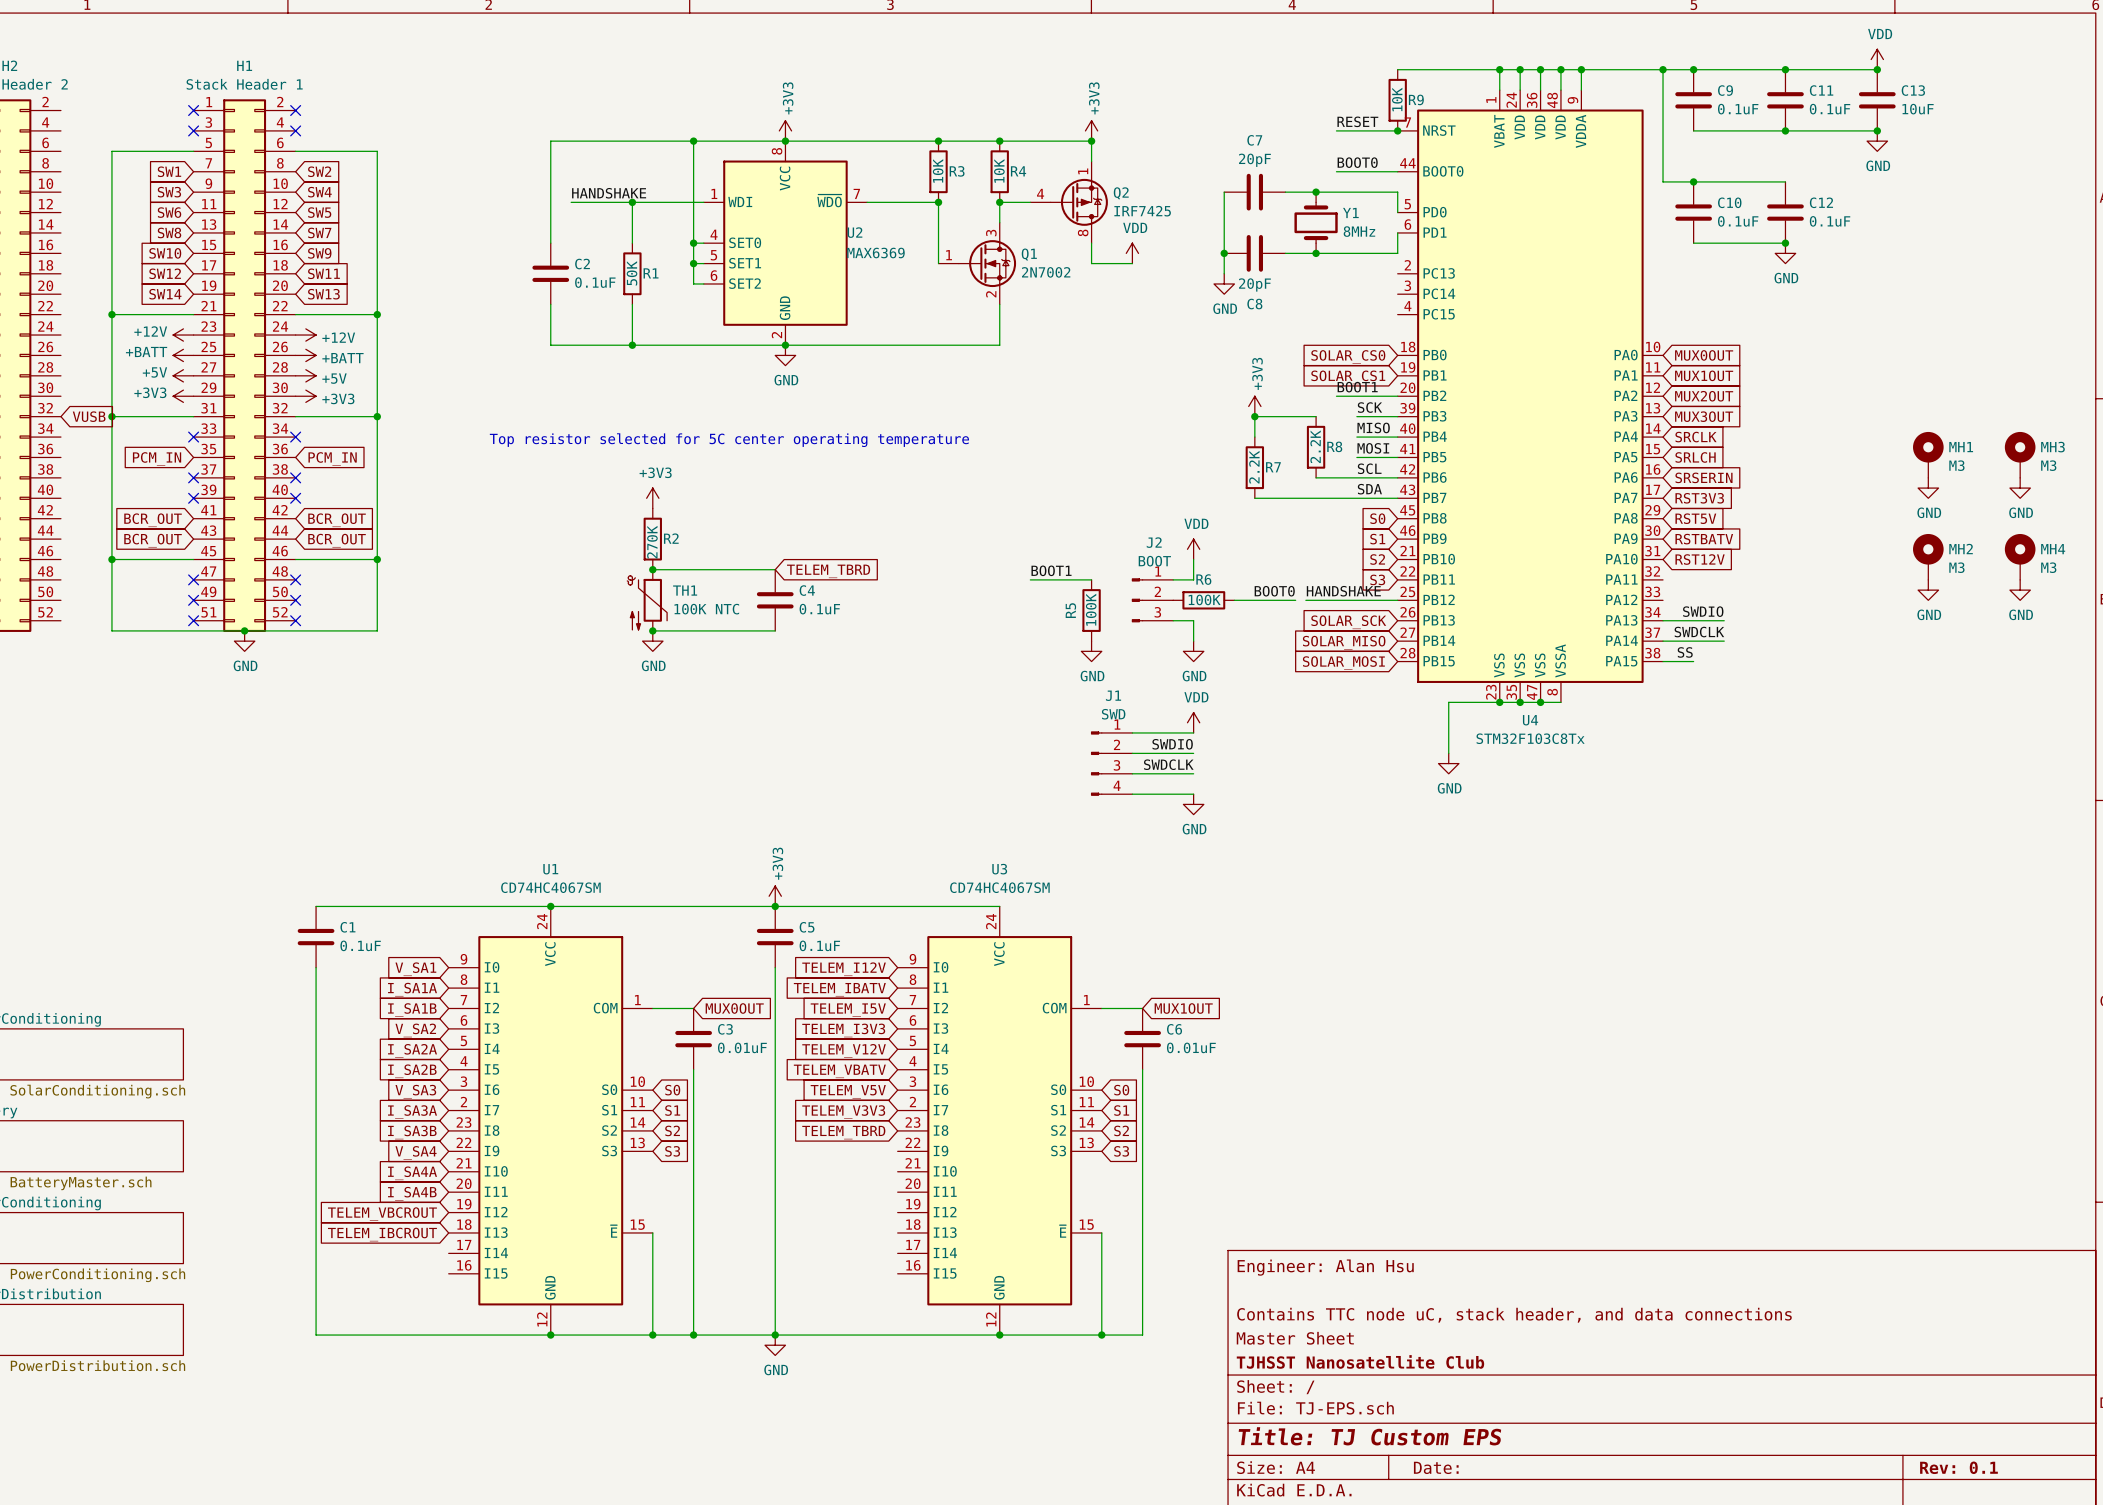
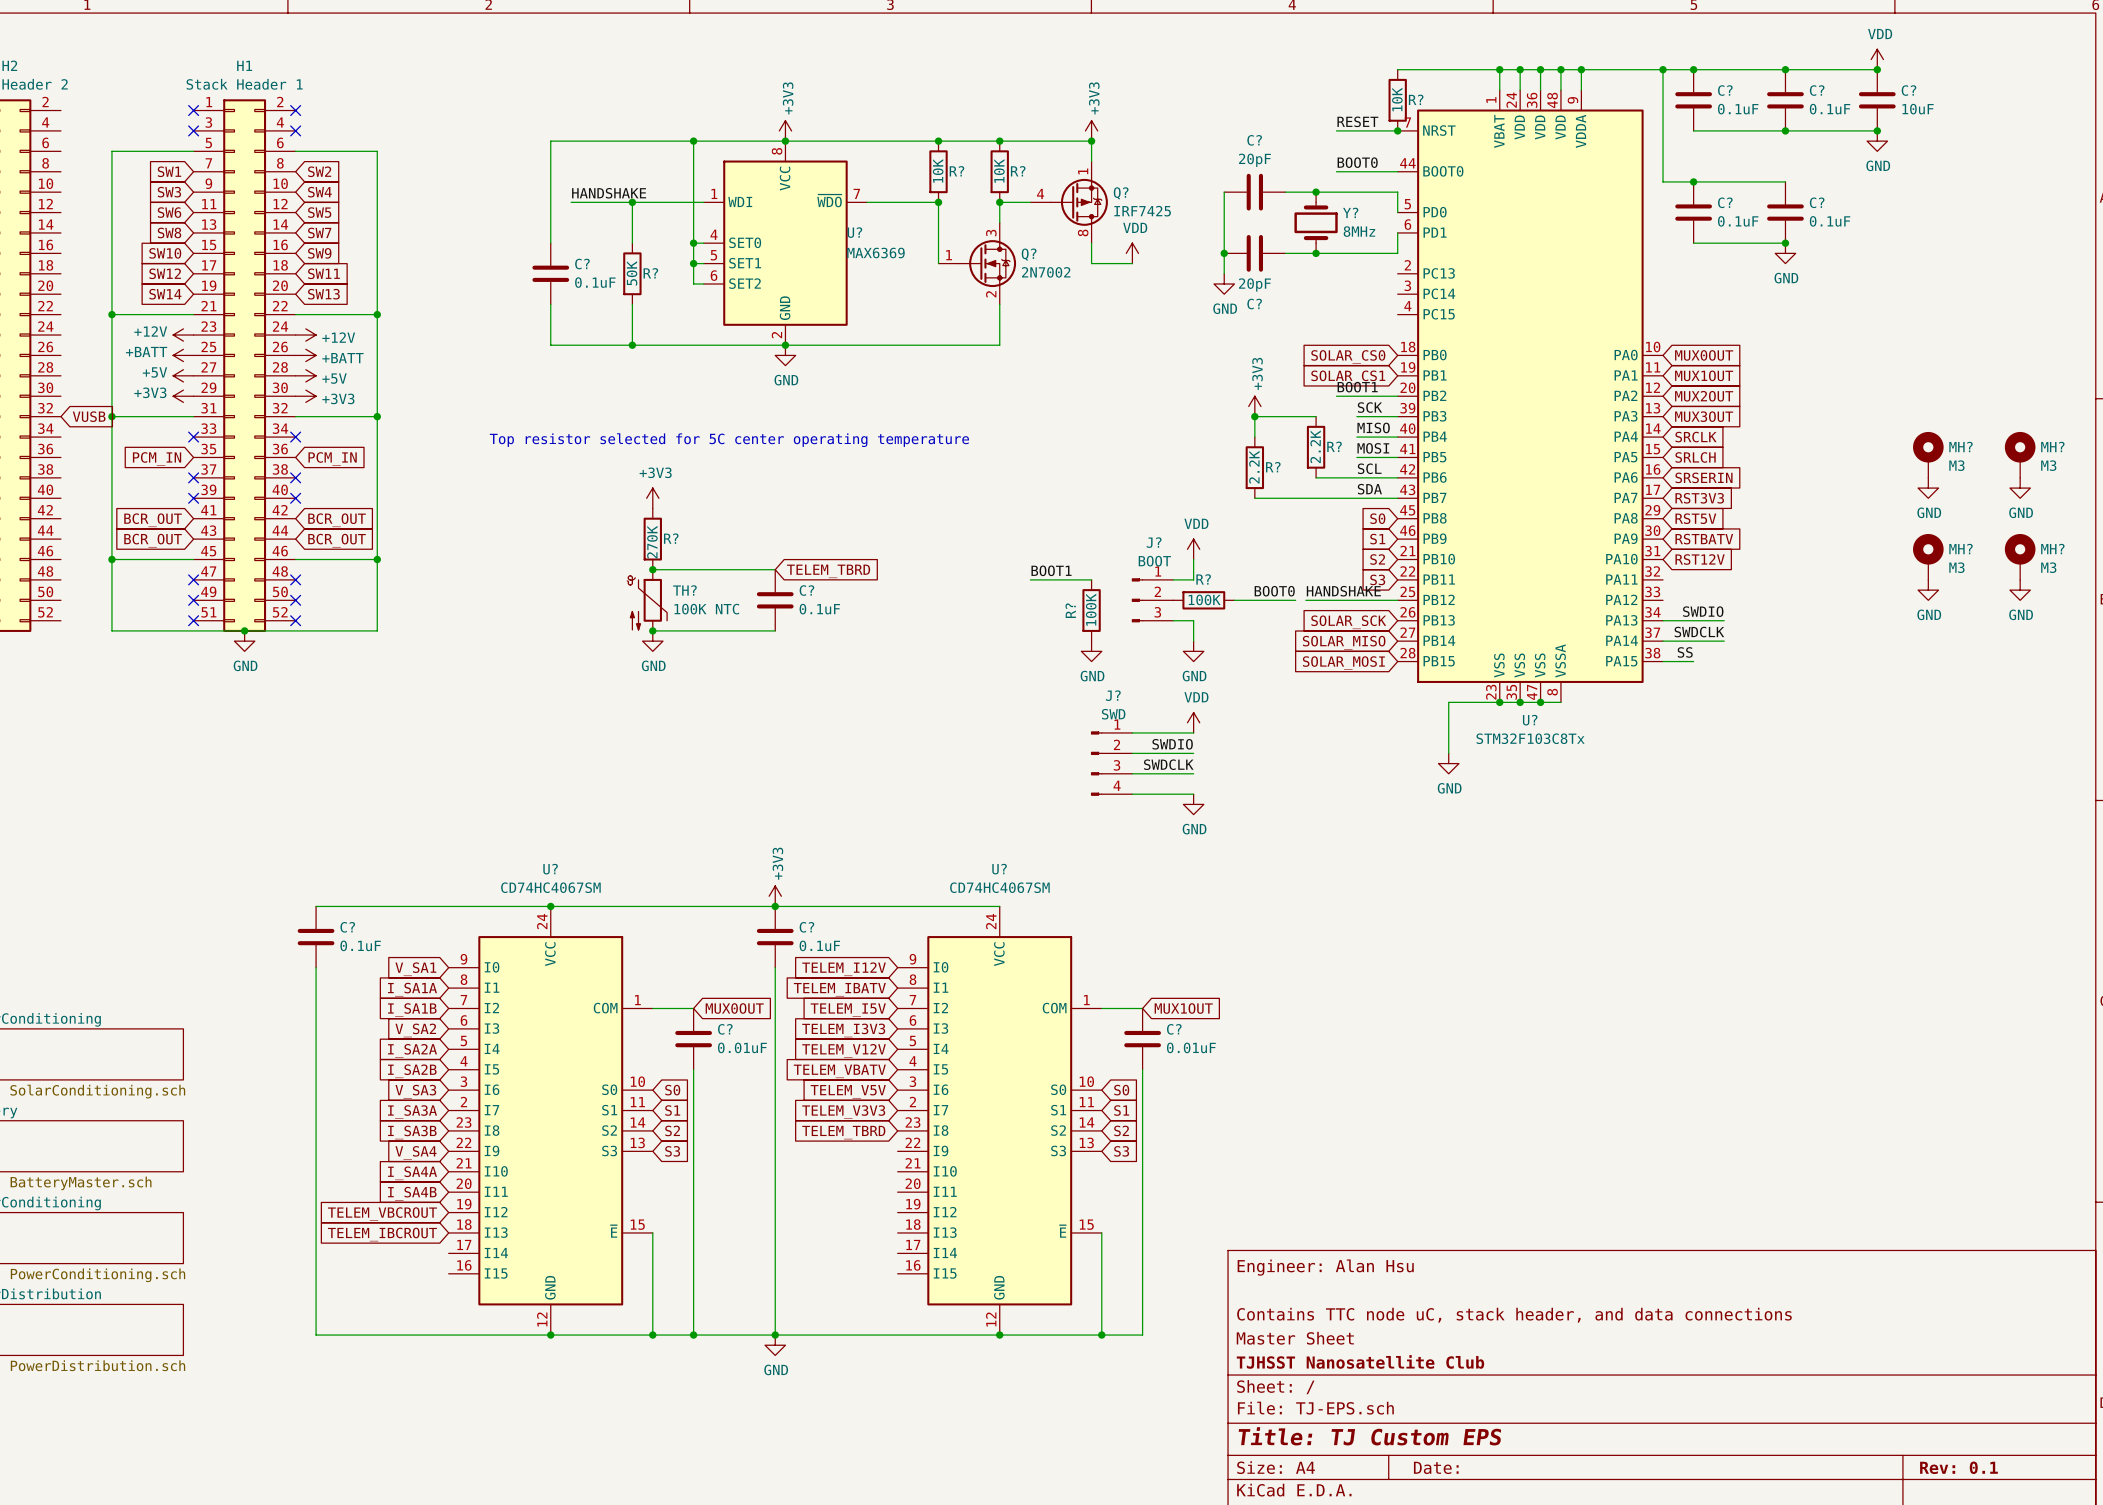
C9 name: C9 (1725, 90) -> C? (1725, 90)
C11 name: C11 (1821, 90) -> C? (1817, 90)
C13 name: C13 (1913, 90) -> C? (1909, 90)
R9 name: R9 (1416, 99) -> R? (1416, 99)
C7 name: C7 (1254, 140) -> C? (1254, 140)
R3 name: R3 (957, 171) -> R? (956, 171)
R4 name: R4 (1018, 171) -> R? (1018, 171)
Q2 name: Q2 (1121, 193) -> Q? (1121, 193)
C10 name: C10 (1729, 202) -> C? (1725, 202)
C12 name: C12 (1821, 202) -> C? (1817, 202)
Y1 name: Y1 (1350, 213) -> Y? (1350, 212)
U2 name: U2 (855, 232) -> U? (854, 232)
Q1 name: Q1 (1029, 254) -> Q? (1029, 254)
C2 name: C2 (582, 264) -> C? (582, 264)
R1 name: R1 (651, 273) -> R? (650, 273)
C8 name: C8 (1254, 304) -> C? (1254, 304)
R8 name: R8 (1334, 446) -> R? (1334, 446)
MH1 name: MH1 (1961, 447) -> MH? (1961, 446)
MH3 name: MH3 (2052, 447) -> MH? (2052, 446)
R7 name: R7 (1273, 467) -> R? (1273, 467)
R2 name: R2 (671, 538) -> R? (671, 538)
J2 name: J2 (1154, 542) -> J? (1154, 542)
MH2 name: MH2 (1961, 549) -> MH? (1961, 549)
MH4 name: MH4 (2053, 549) -> MH? (2052, 549)
R6 name: R6 (1203, 579) -> R? (1203, 579)
TH1 name: TH1 (685, 590) -> TH? (684, 590)
C4 name: C4 (807, 590) -> C? (806, 590)
R5 name: R5 (1070, 610) -> R? (1070, 610)
J1 name: J1 (1113, 695) -> J? (1113, 695)
U4 name: U4 (1530, 720) -> U? (1530, 720)
U1 name: U1 (550, 869) -> U? (550, 869)
U3 name: U3 (999, 869) -> U? (999, 869)
C1 name: C1 (347, 927) -> C? (347, 927)
C5 name: C5 (807, 927) -> C? (806, 927)
C3 name: C3 (725, 1029) -> C? (725, 1029)
C6 name: C6 (1174, 1029) -> C? (1174, 1029)

